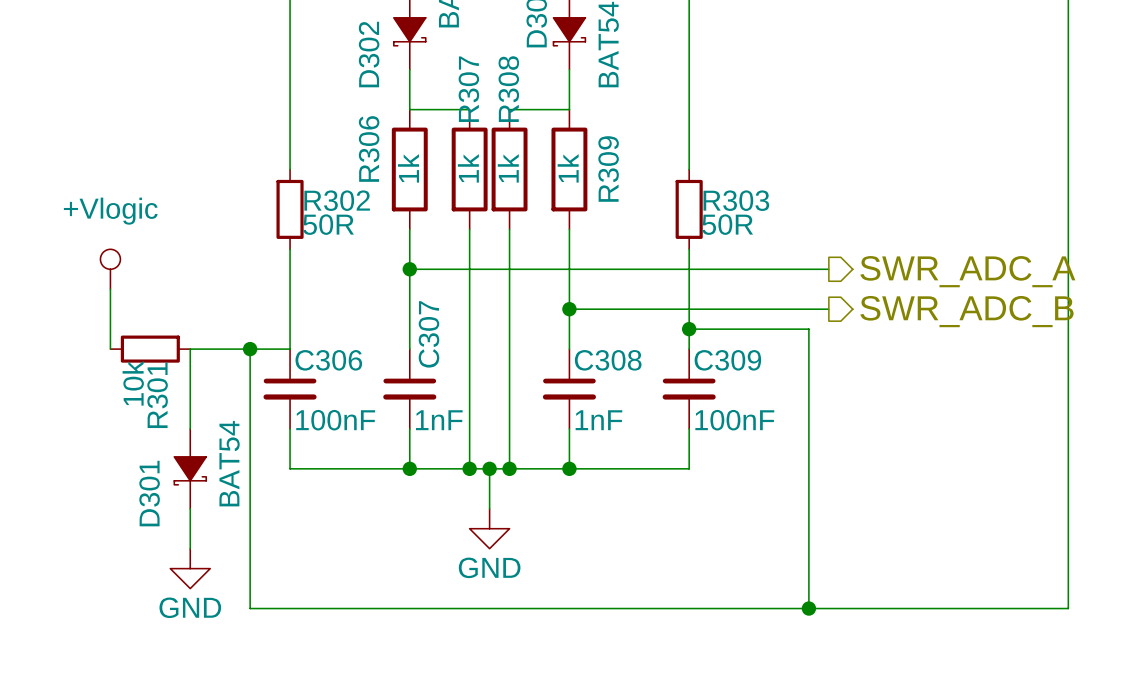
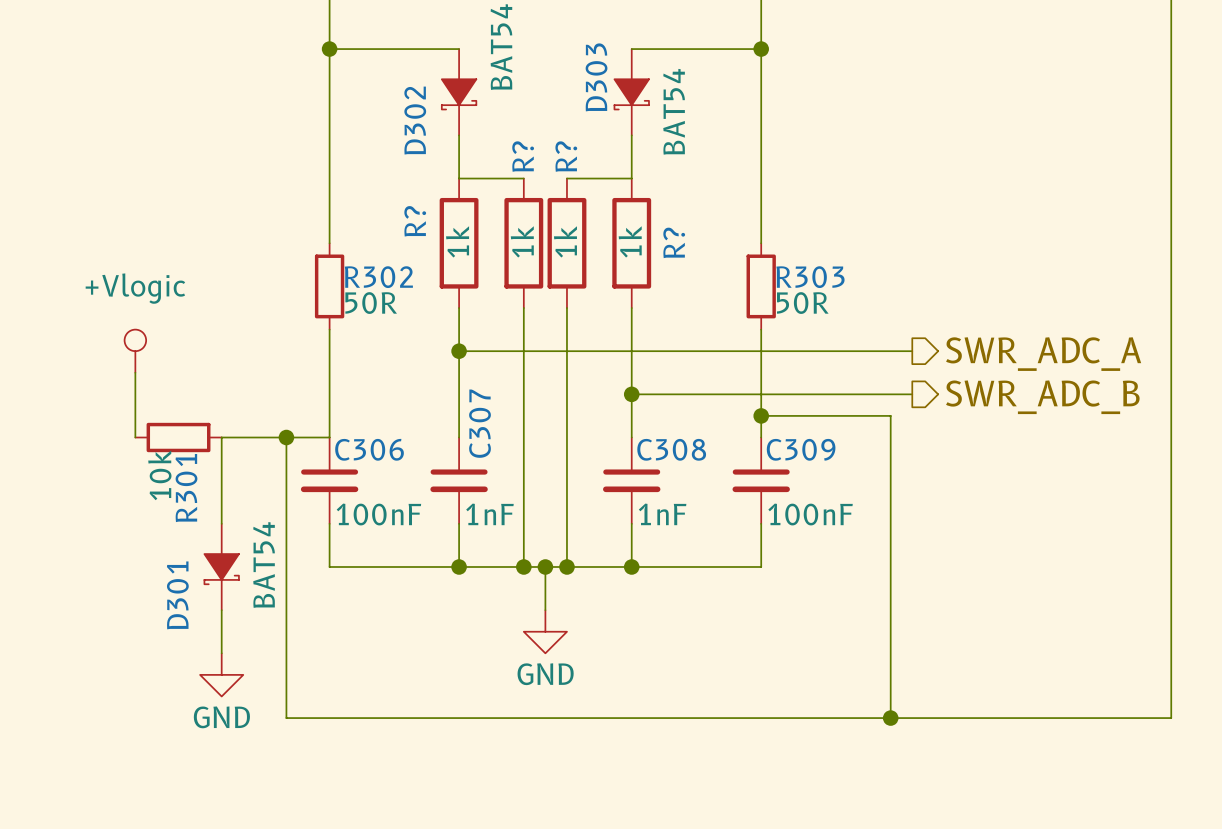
R307 name: R307 (468, 89) -> R? (523, 156)
R308 name: R308 (508, 89) -> R? (566, 156)
R306 name: R306 (369, 148) -> R? (415, 221)
R309 name: R309 (608, 168) -> R? (674, 242)

